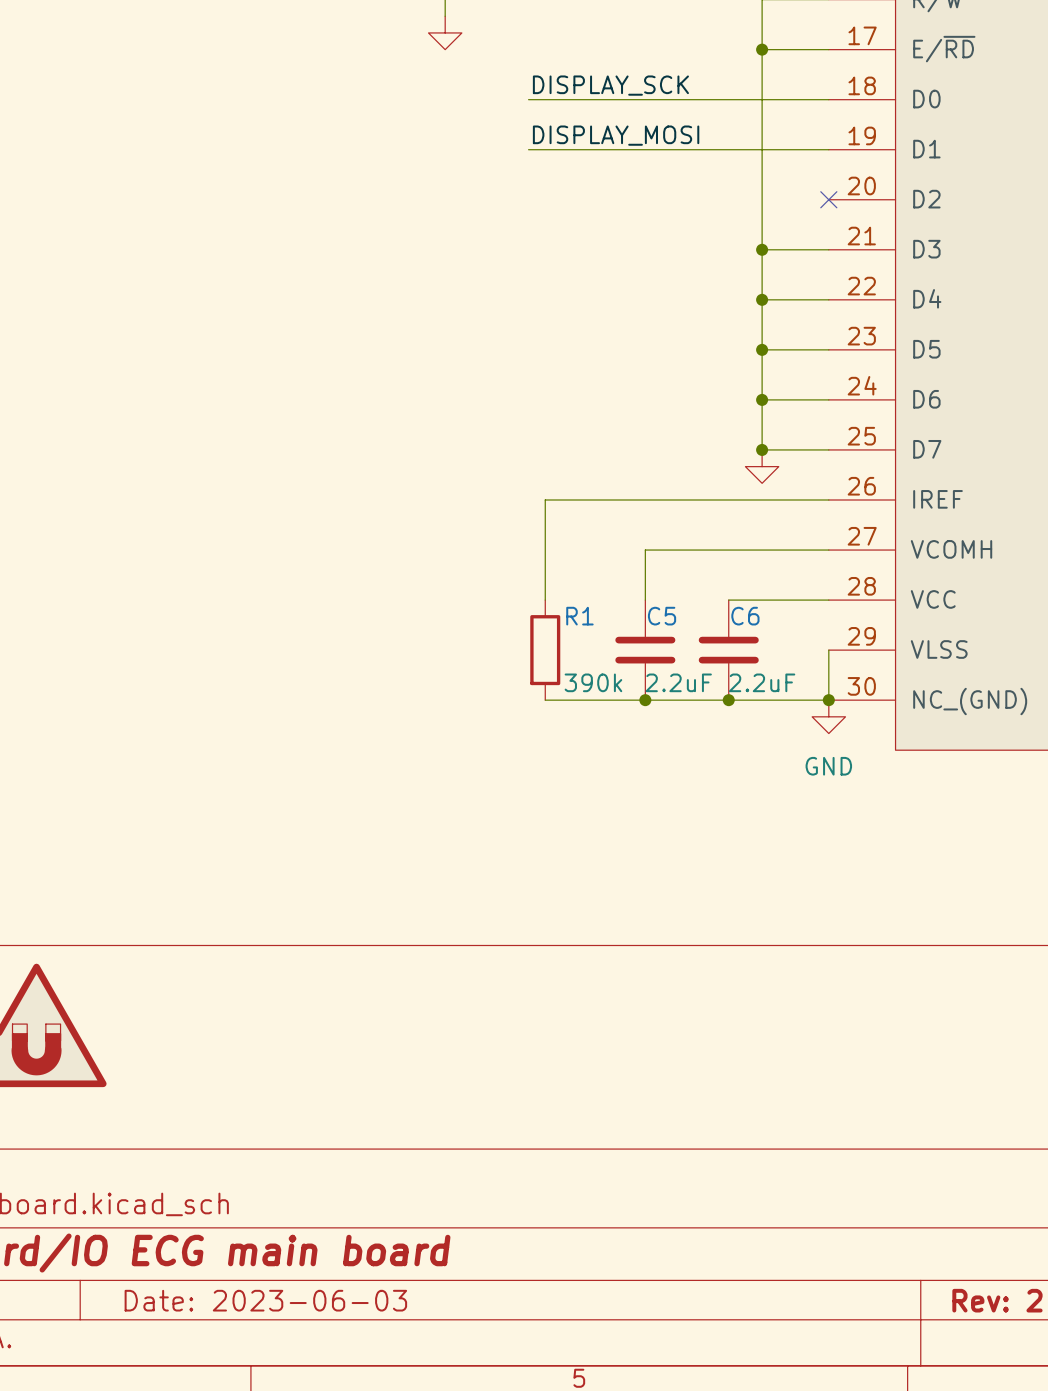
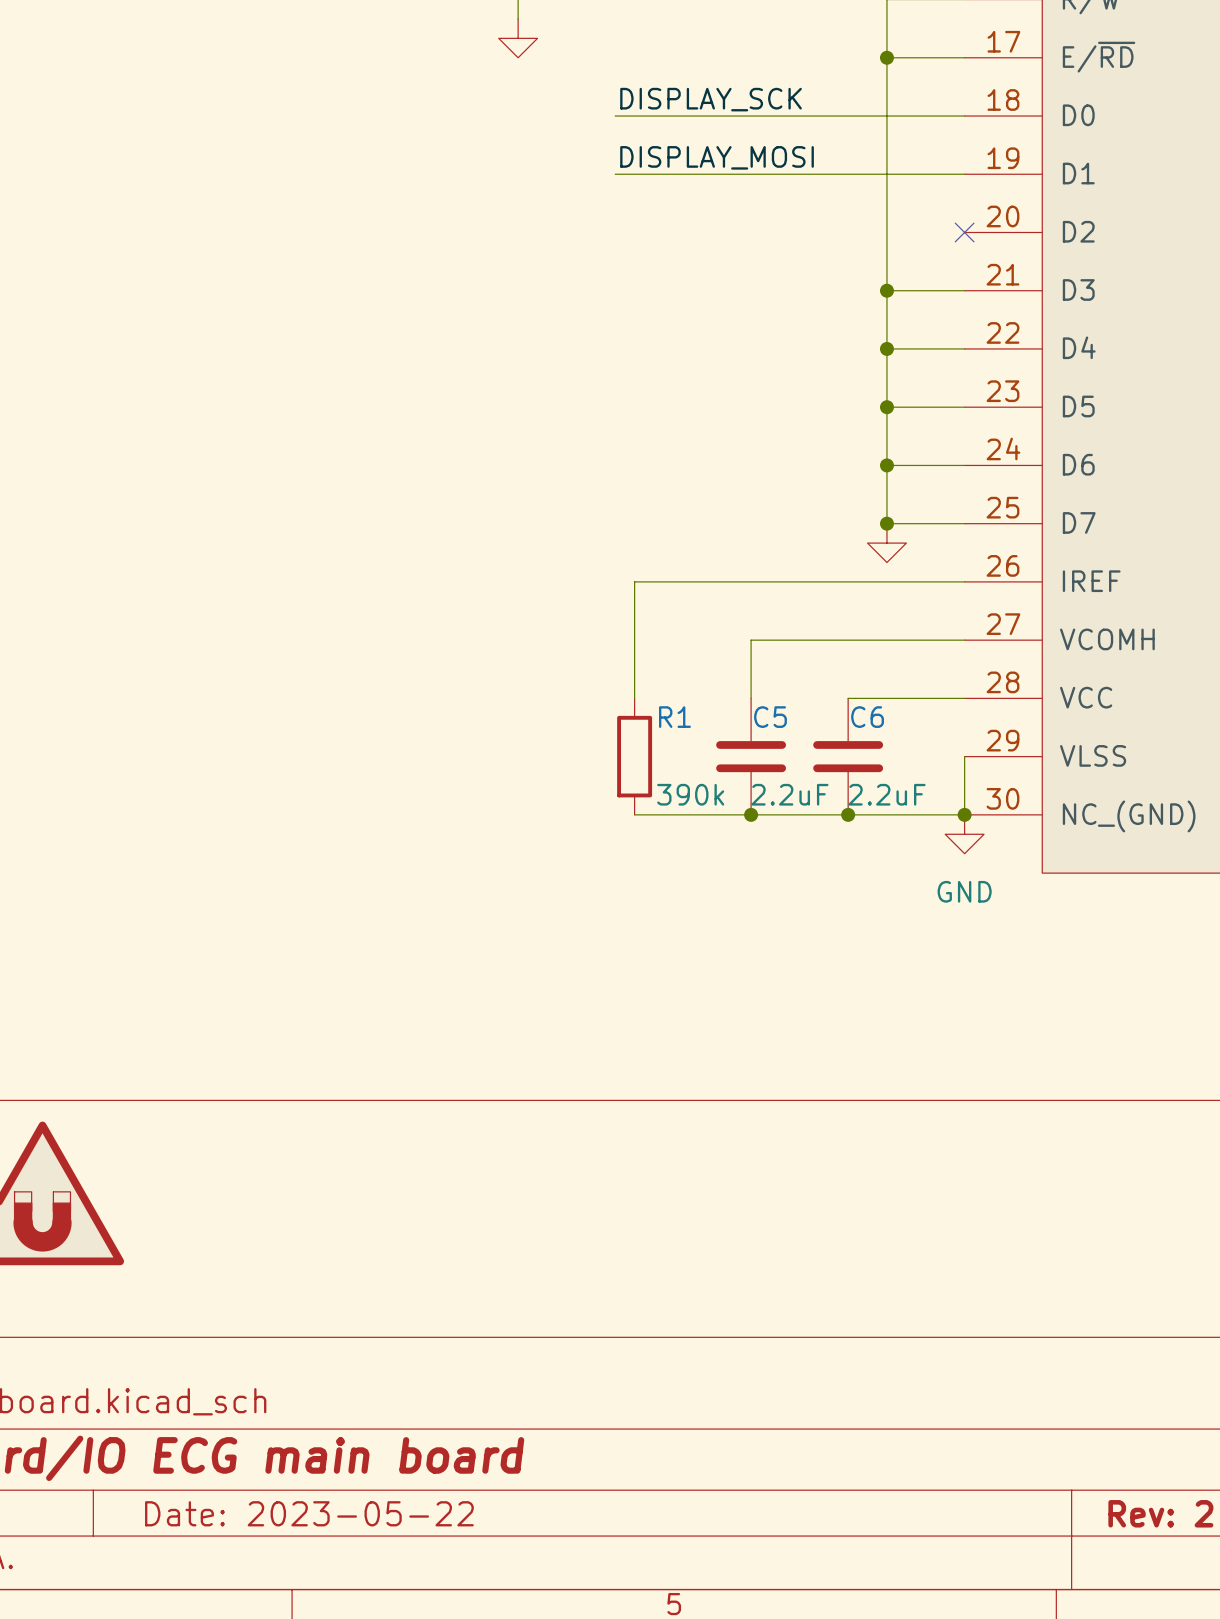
title block: Date: 2023-06-03 (265, 1300) -> Date: 2023-05-22 (309, 1513)

